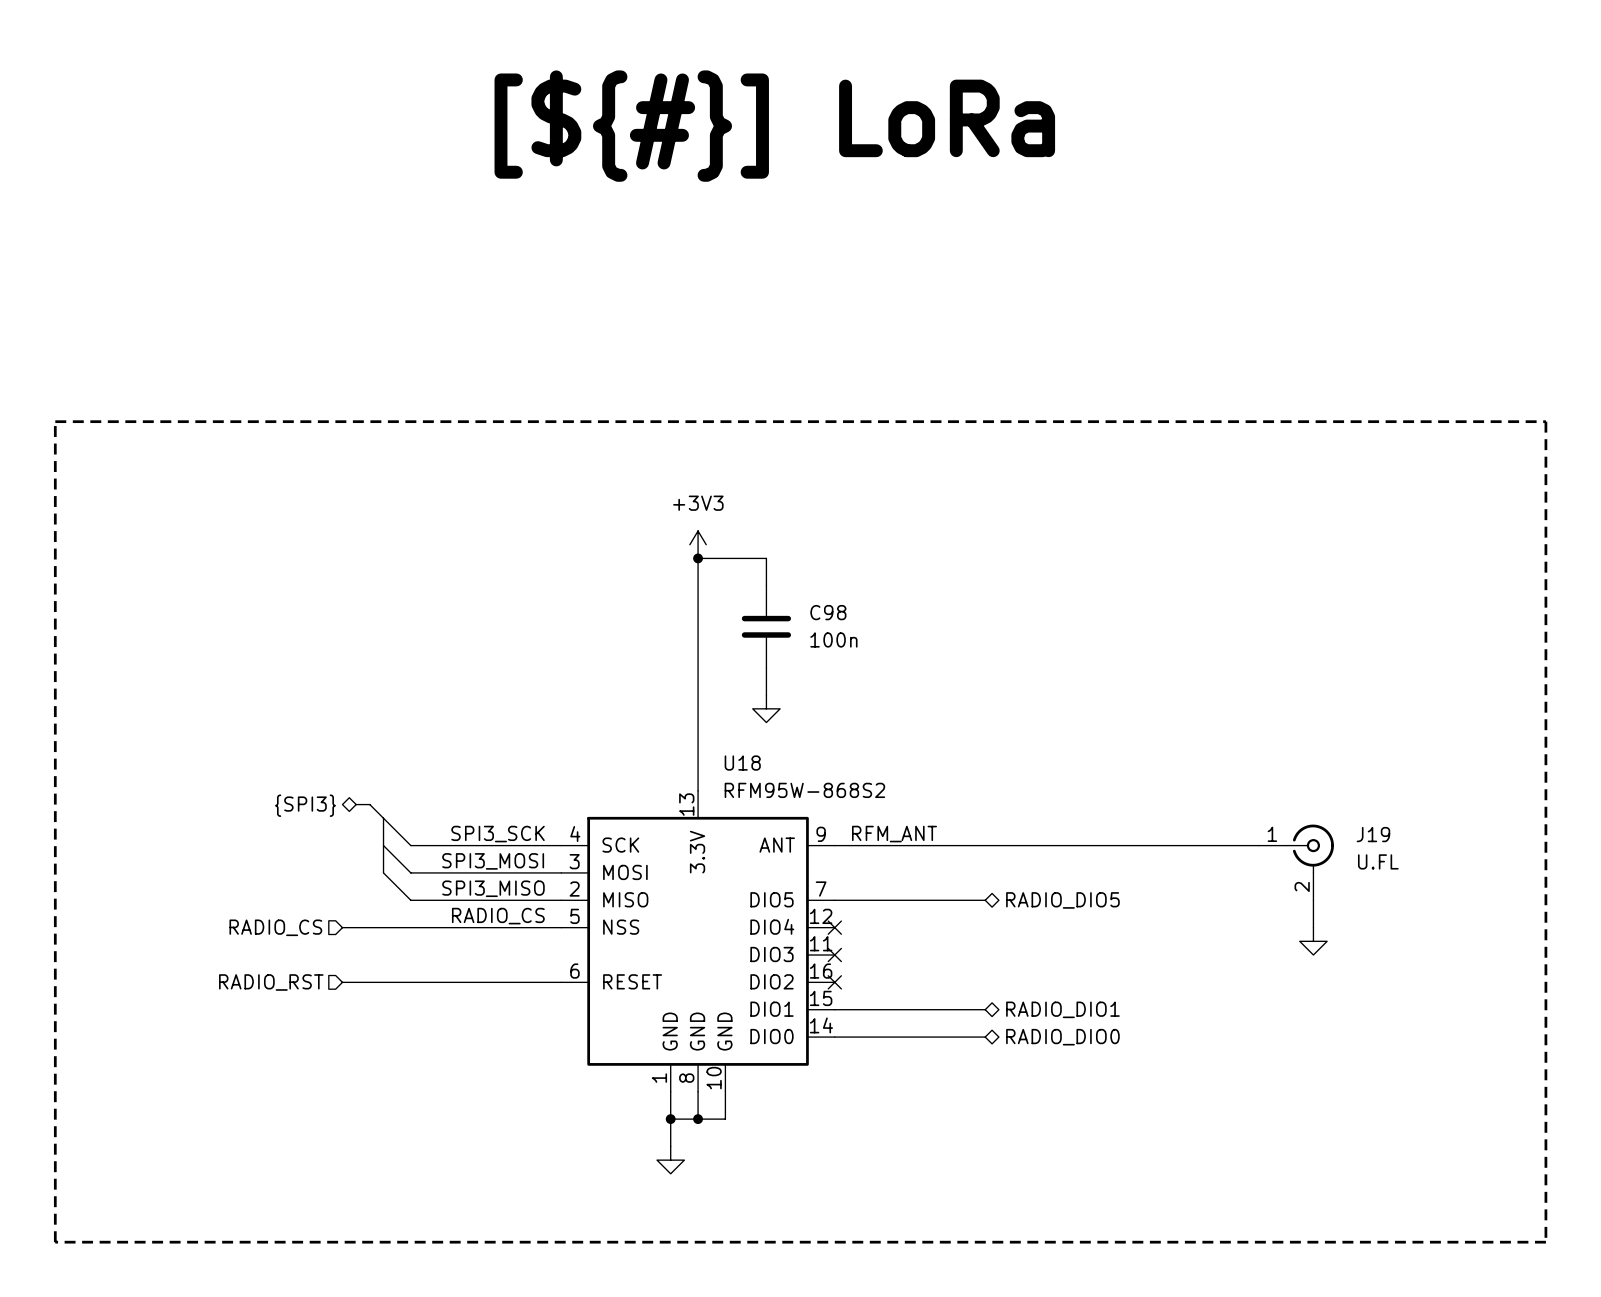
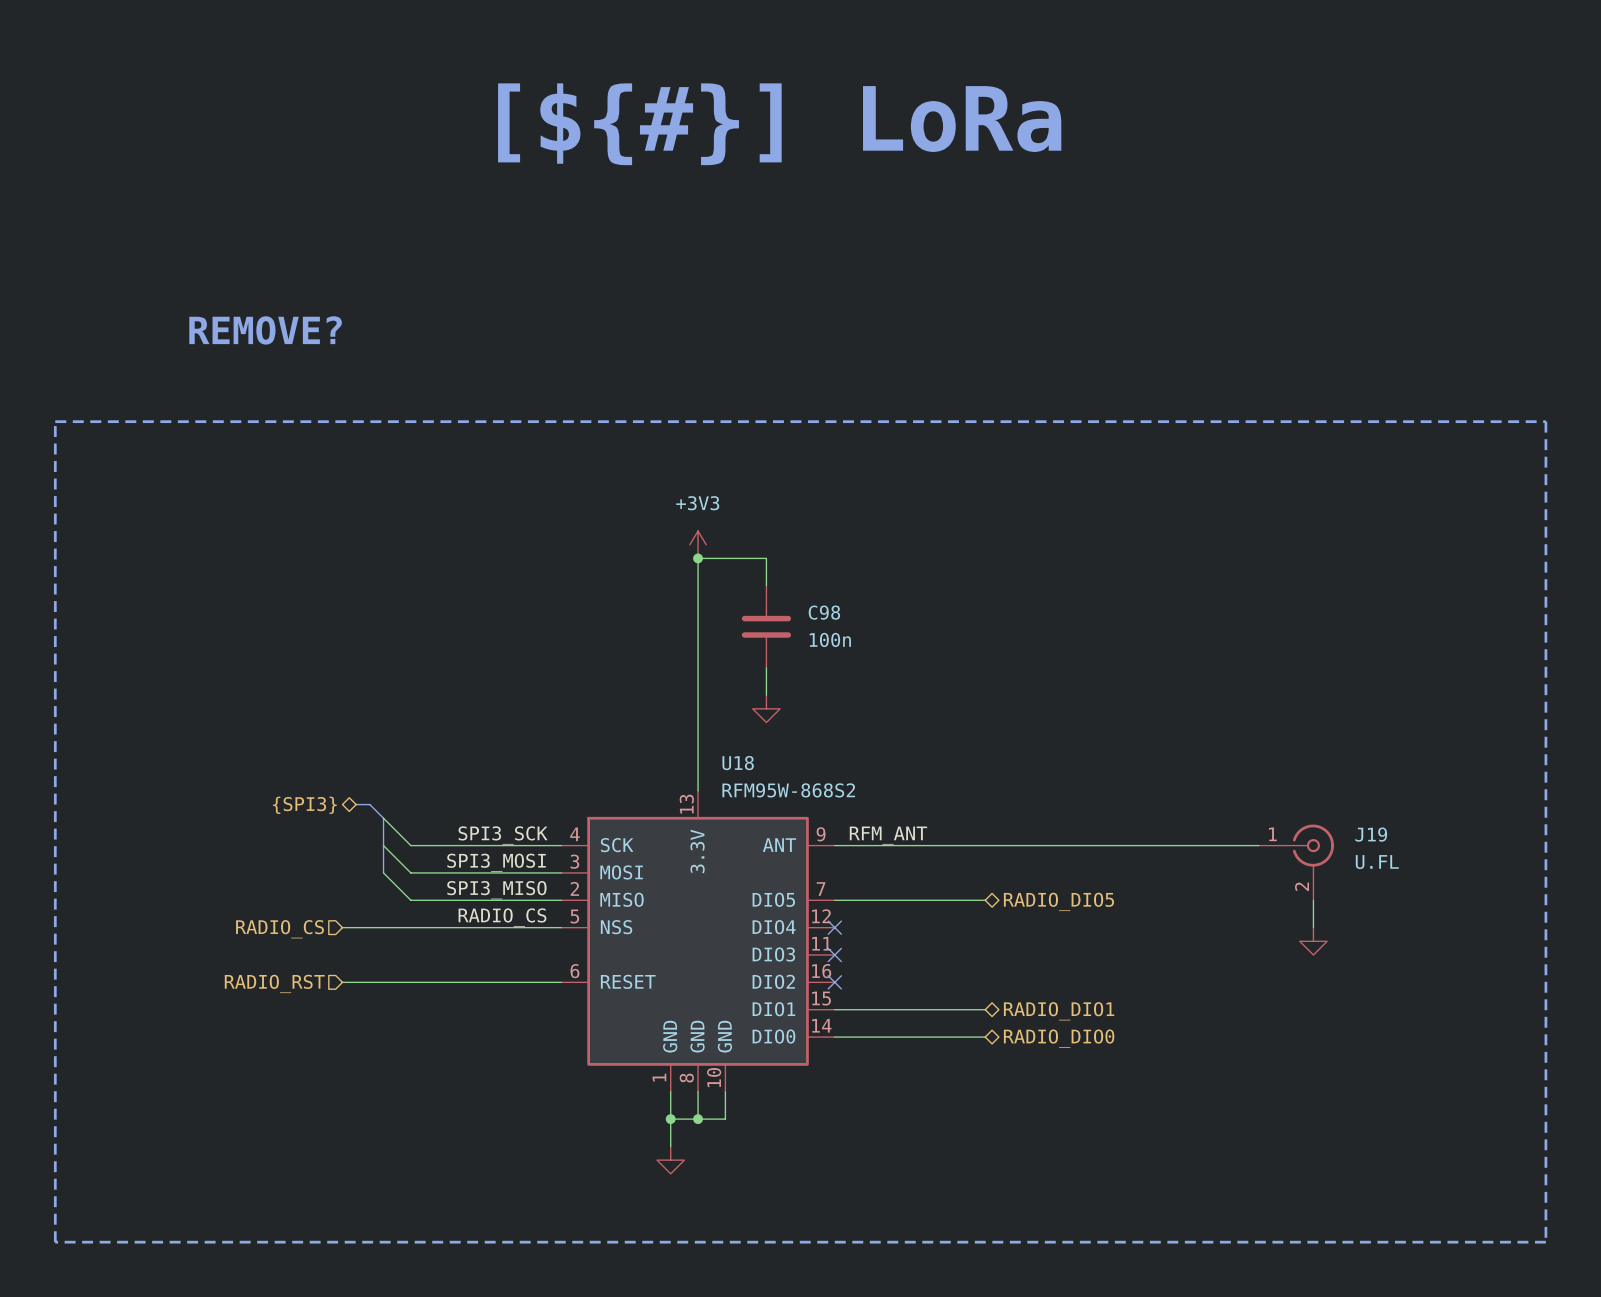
text: none -> REMOVE? (265, 330)

